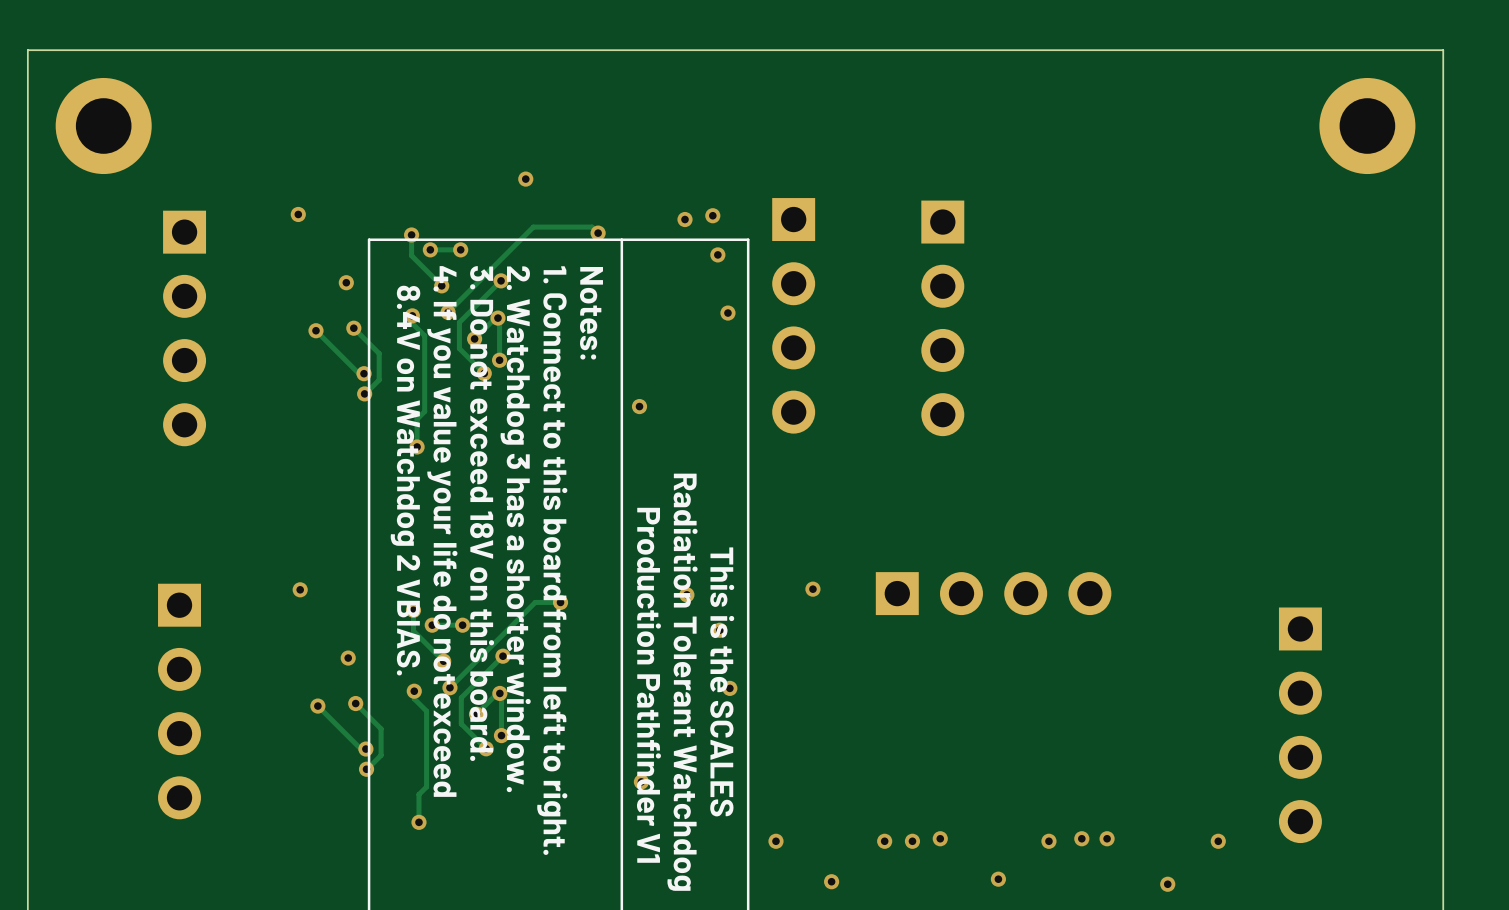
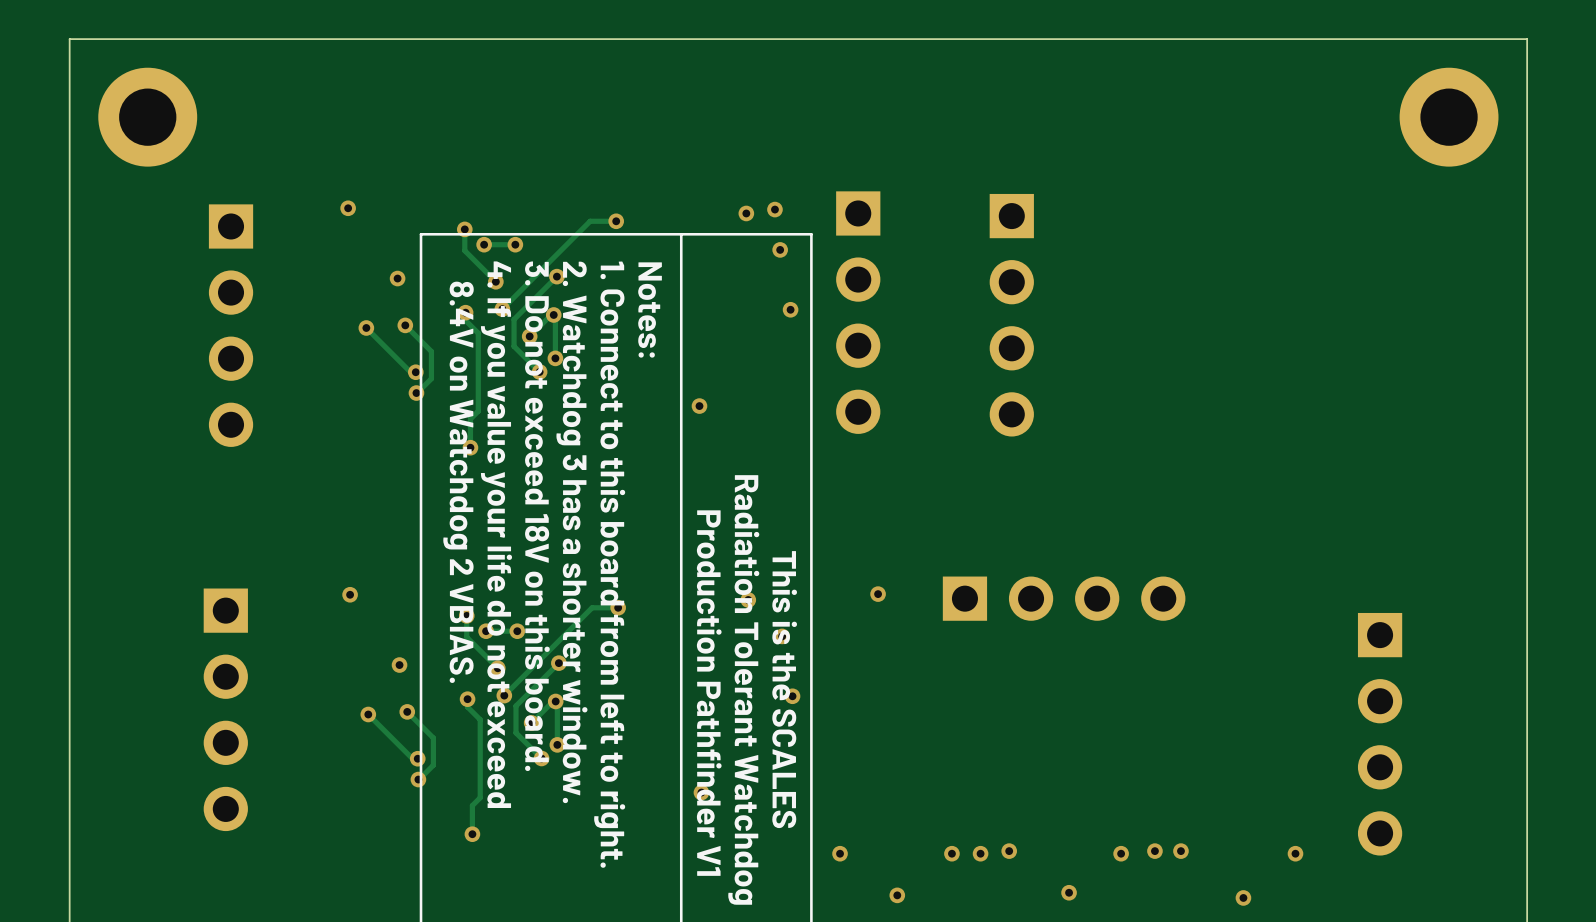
via: (525, 179) -> none
track: (558, 227) (592, 227) (598, 233) -> none
via: none -> (616, 221)
via: (598, 233) -> none

